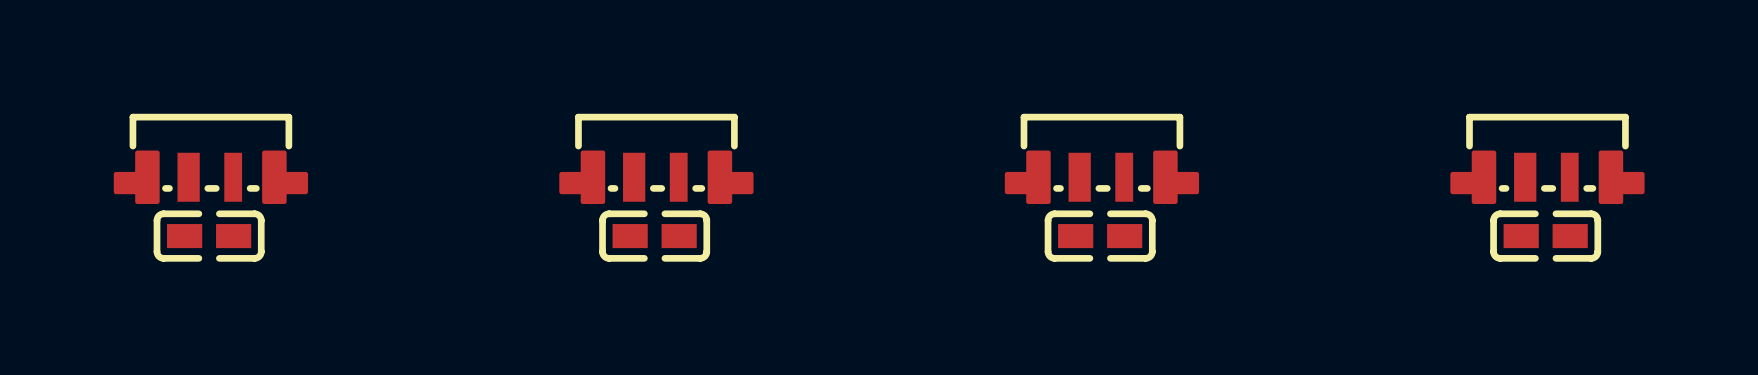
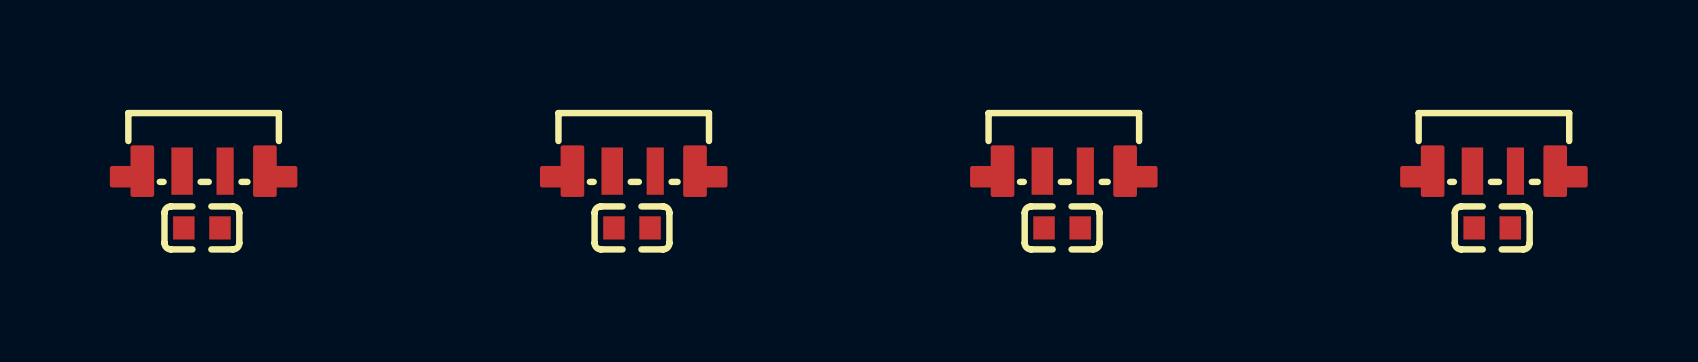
part footprint: [153, 210, 265, 262] -> [161, 203, 243, 253]
part footprint: [599, 210, 711, 262] -> [591, 203, 673, 253]
part footprint: [1044, 210, 1156, 262] -> [1021, 203, 1103, 253]
part footprint: [1490, 210, 1602, 262] -> [1451, 203, 1533, 253]

